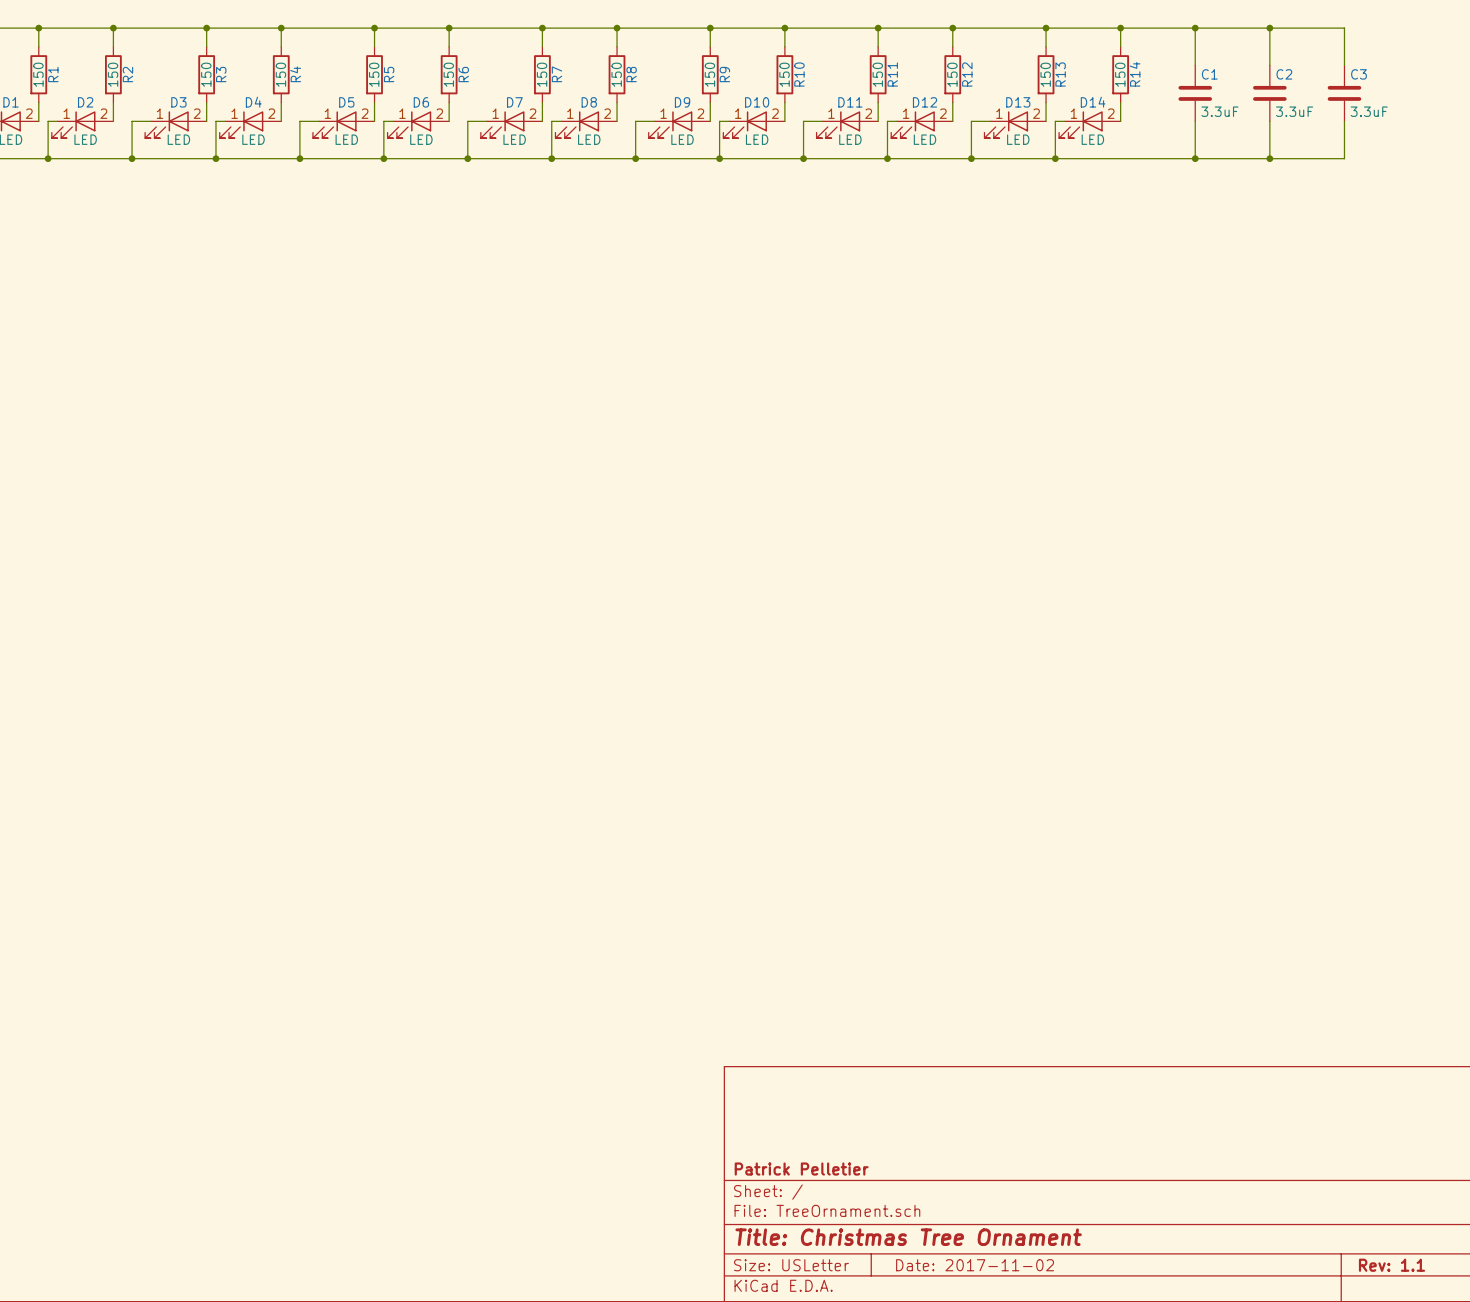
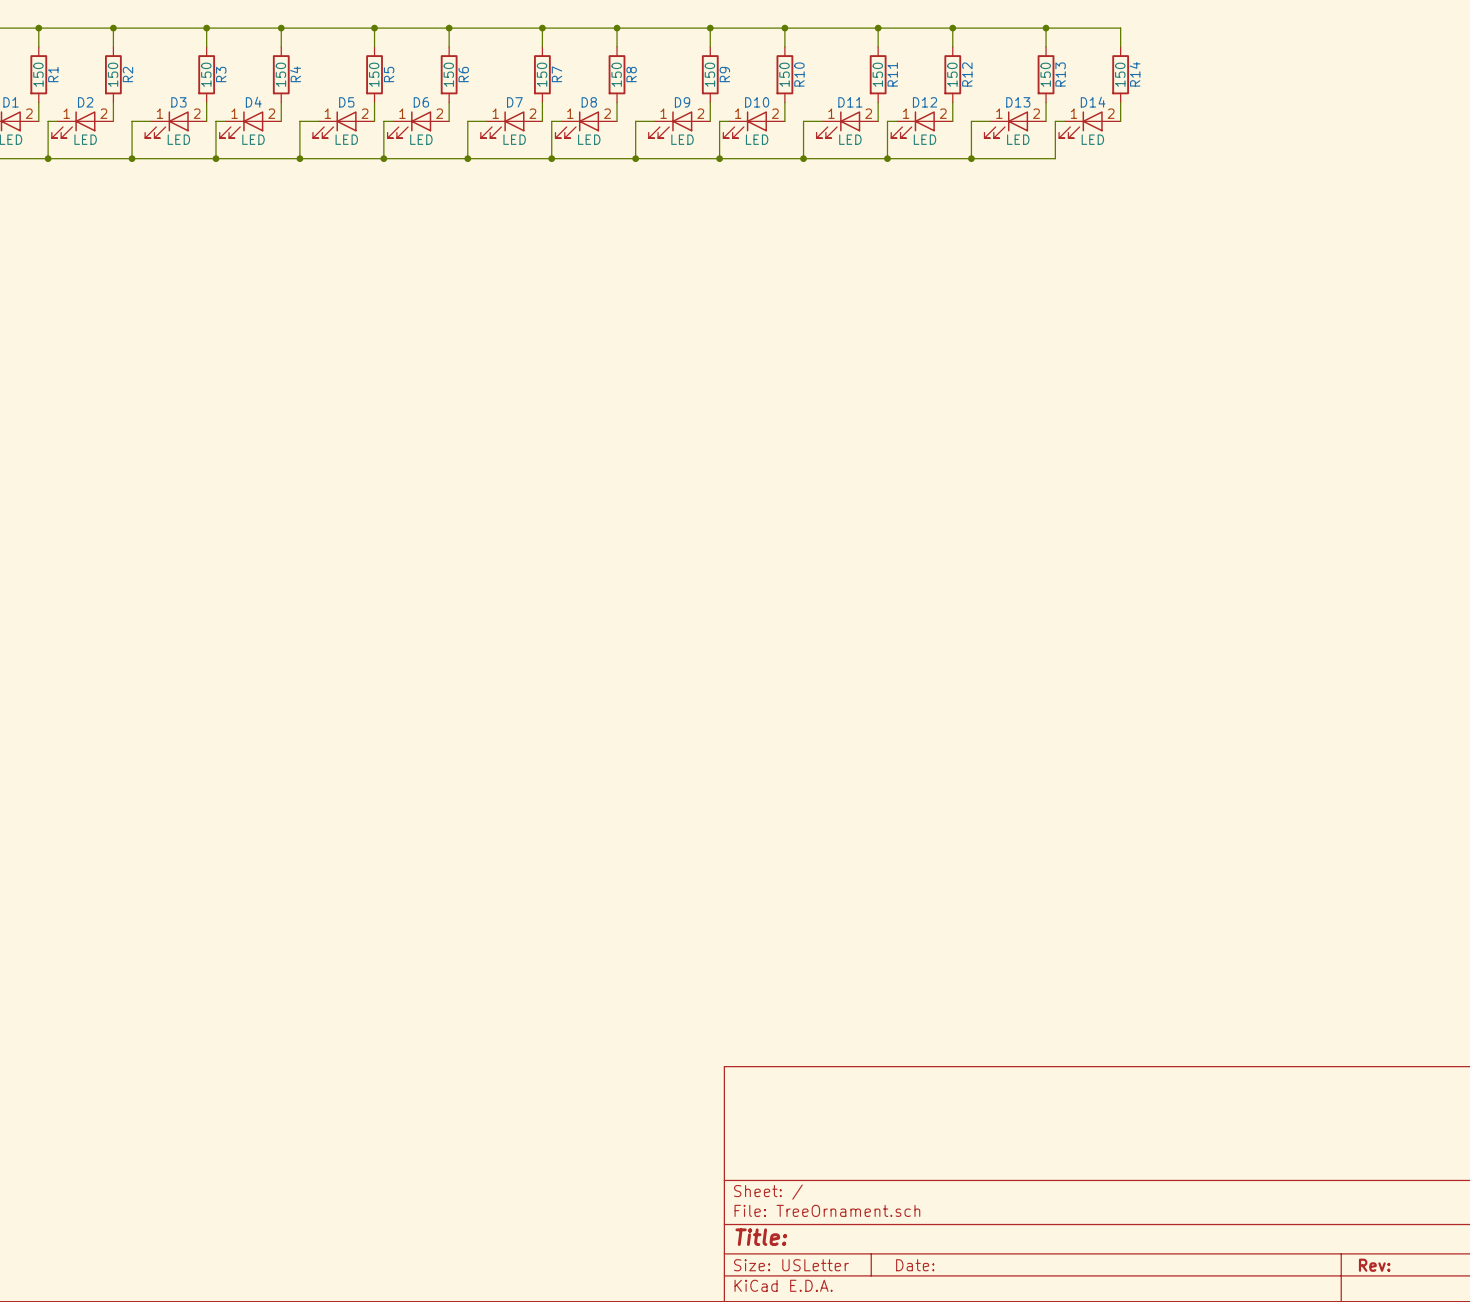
wire: (1120, 28) (1344, 28) (1344, 65) -> none
junction: (1120, 28) -> none
wire: (1195, 28) (1195, 65) -> none
junction: (1195, 28) -> none
wire: (1269, 28) (1269, 65) -> none
junction: (1269, 28) -> none
C1: 3.3uF (1195, 93) -> none
C2: 3.3uF (1269, 93) -> none
C3: 3.3uF (1344, 93) -> none
wire: (1195, 121) (1195, 158) -> none
wire: (1269, 121) (1269, 158) -> none
wire: (1344, 121) (1344, 158) (1055, 158) -> none
junction: (1055, 158) -> none
junction: (1195, 158) -> none
junction: (1269, 158) -> none
title block: Patrick Pelletier (801, 1169) -> none
title block: Title: Christmas Tree Ornament (908, 1237) -> Title: (761, 1237)
title block: Date: 2017-11-02 (975, 1265) -> Date: (915, 1265)
title block: Rev: 1.1 (1391, 1265) -> Rev: (1374, 1265)

